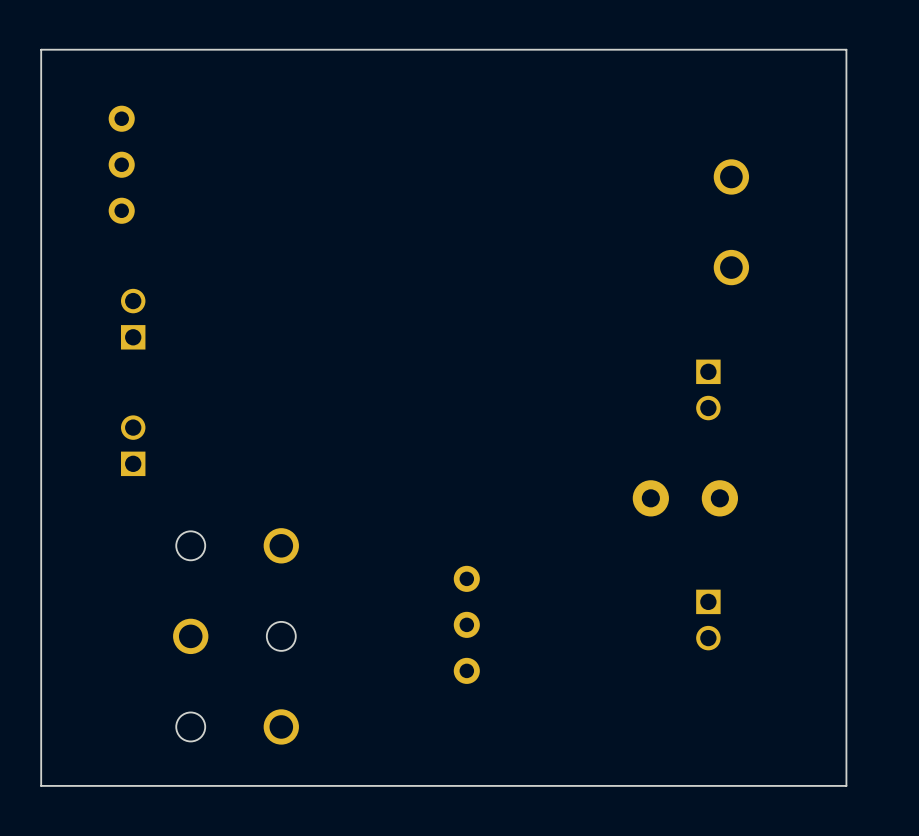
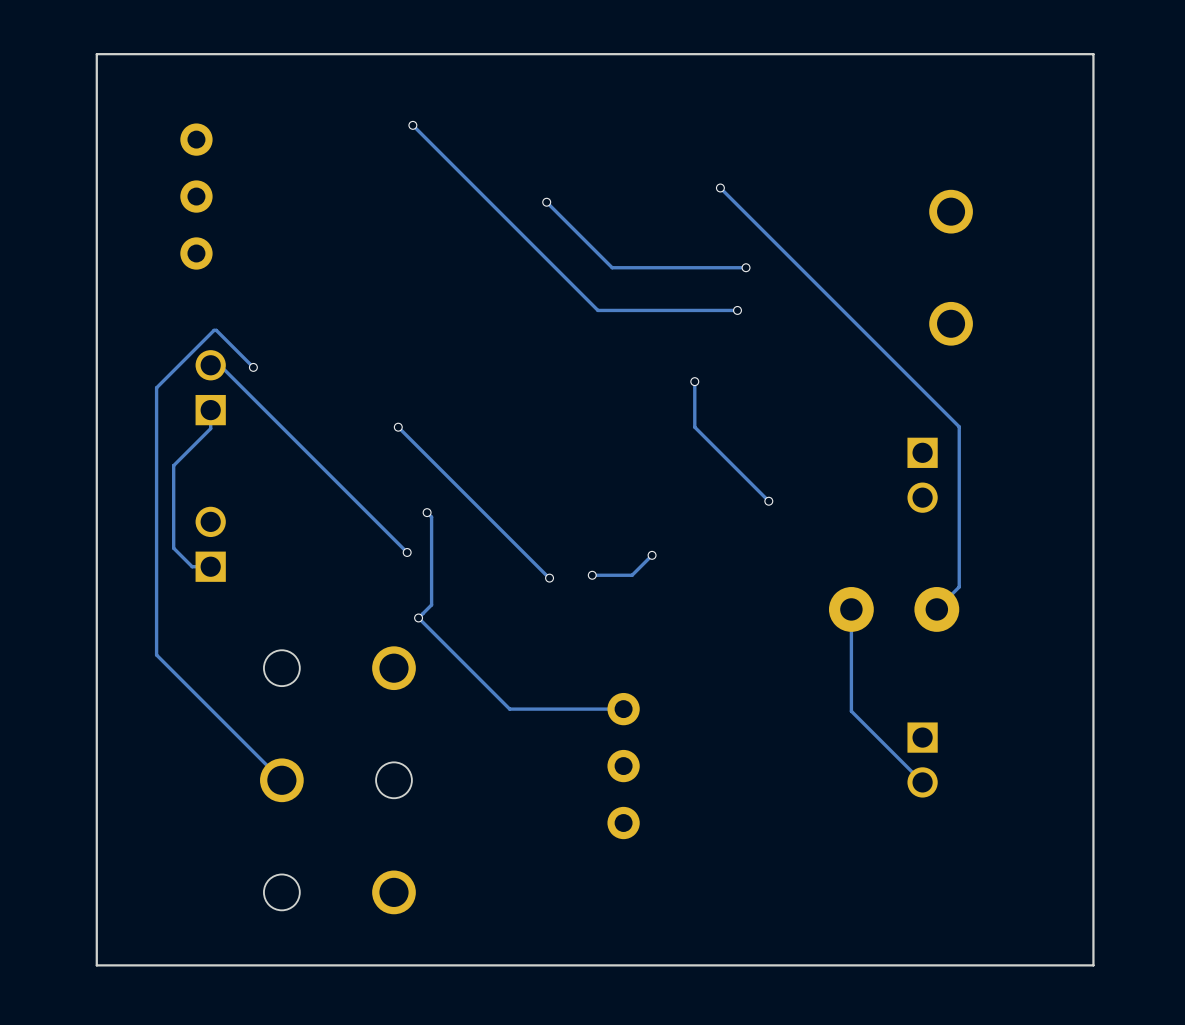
track: none -> (412, 125) (597, 310) (737, 310)
via: none -> (412, 125)
track: none -> (720, 188) (959, 426) (959, 587) (936, 609)
via: none -> (720, 188)
track: none -> (546, 202) (612, 267) (746, 267)
via: none -> (546, 202)
via: none -> (746, 267)
via: none -> (737, 310)
track: none -> (210, 365) (219, 365) (407, 552)
track: none -> (253, 367) (216, 330) (214, 330) (156, 387) (156, 655) (281, 780)
via: none -> (253, 367)
track: none -> (694, 381) (694, 427) (768, 501)
via: none -> (694, 381)
track: none -> (210, 410) (210, 428) (173, 465) (173, 548) (192, 566) (210, 566)
track: none -> (398, 427) (549, 578)
via: none -> (398, 427)
via: none -> (768, 501)
track: none -> (427, 512) (431, 517) (431, 604) (418, 617) (509, 709) (623, 709)
via: none -> (427, 512)
via: none -> (407, 552)
track: none -> (652, 555) (632, 575) (592, 575)
via: none -> (652, 555)
via: none -> (592, 575)
via: none -> (549, 578)
track: none -> (851, 609) (851, 711) (922, 782)
via: none -> (418, 617)

